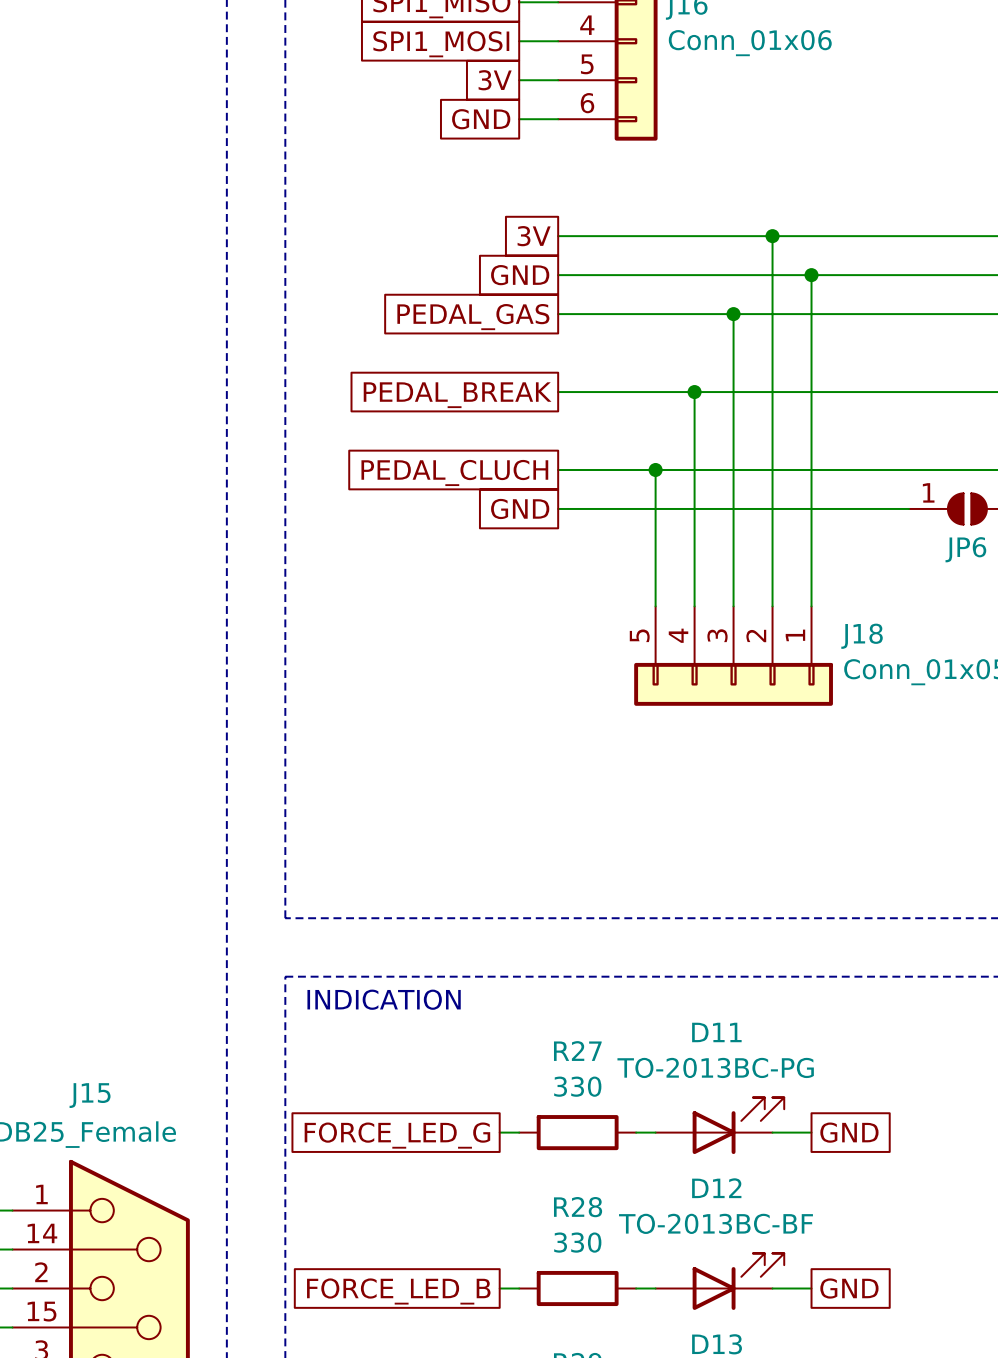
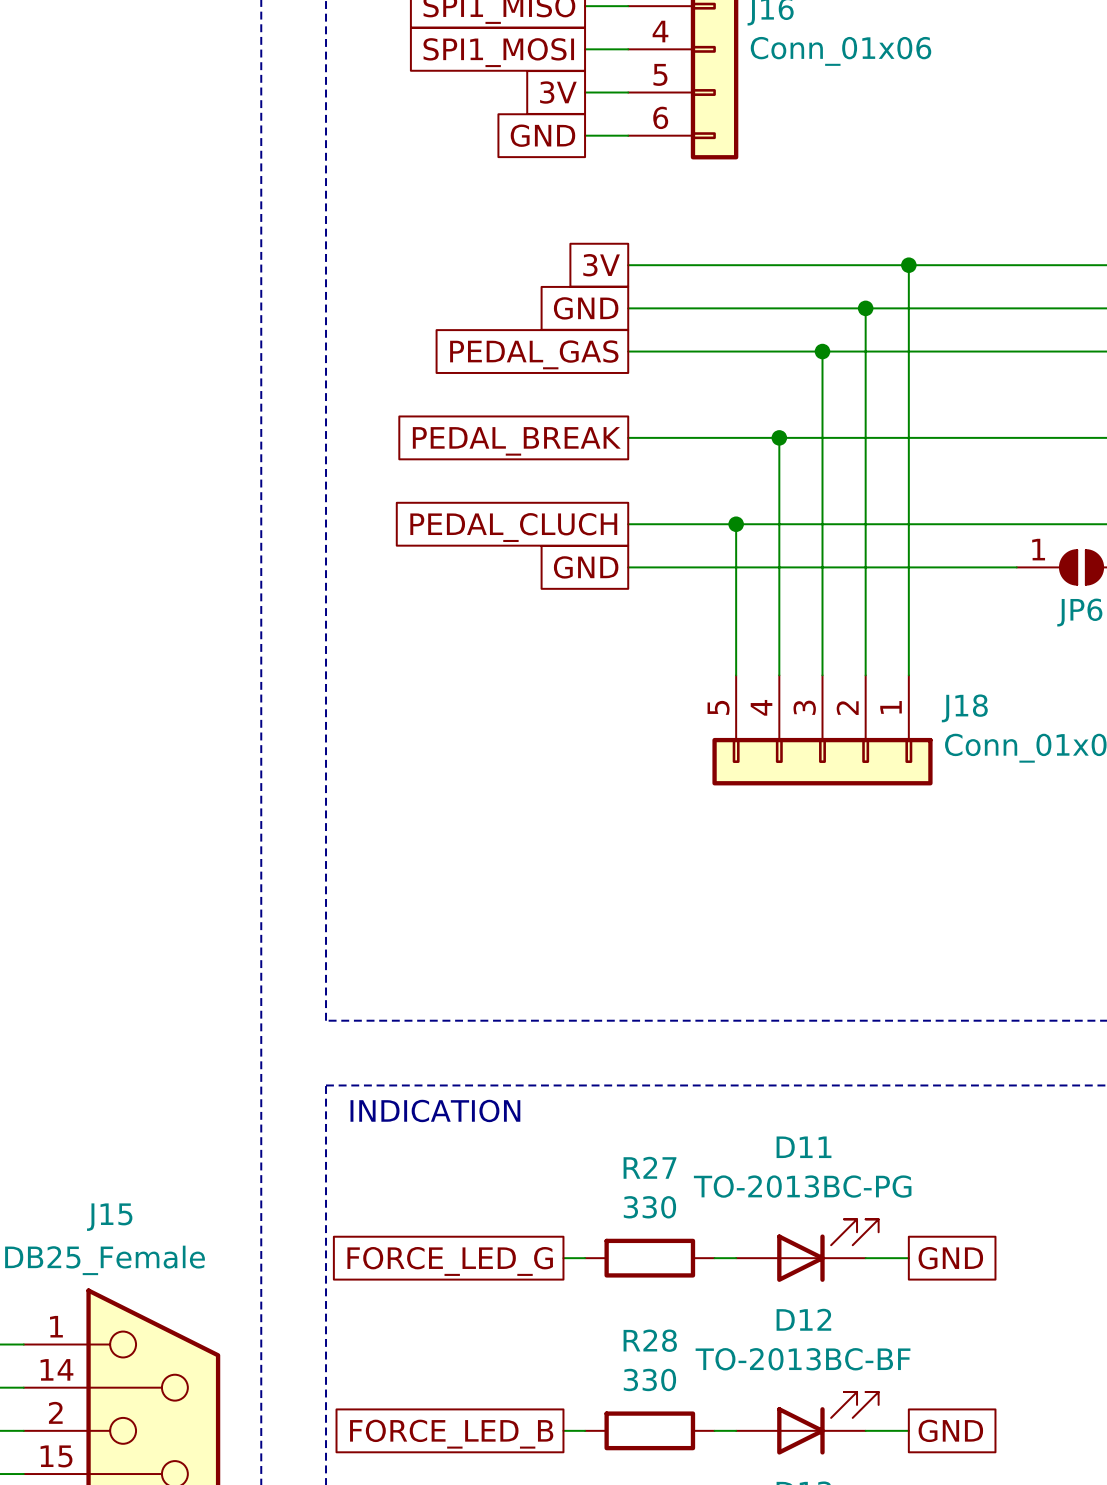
wire: (772, 236) (772, 275) -> (908, 265) (908, 308)
junction: (772, 236) -> none
junction: none -> (908, 265)
junction: none -> (865, 308)
junction: (811, 275) -> none

